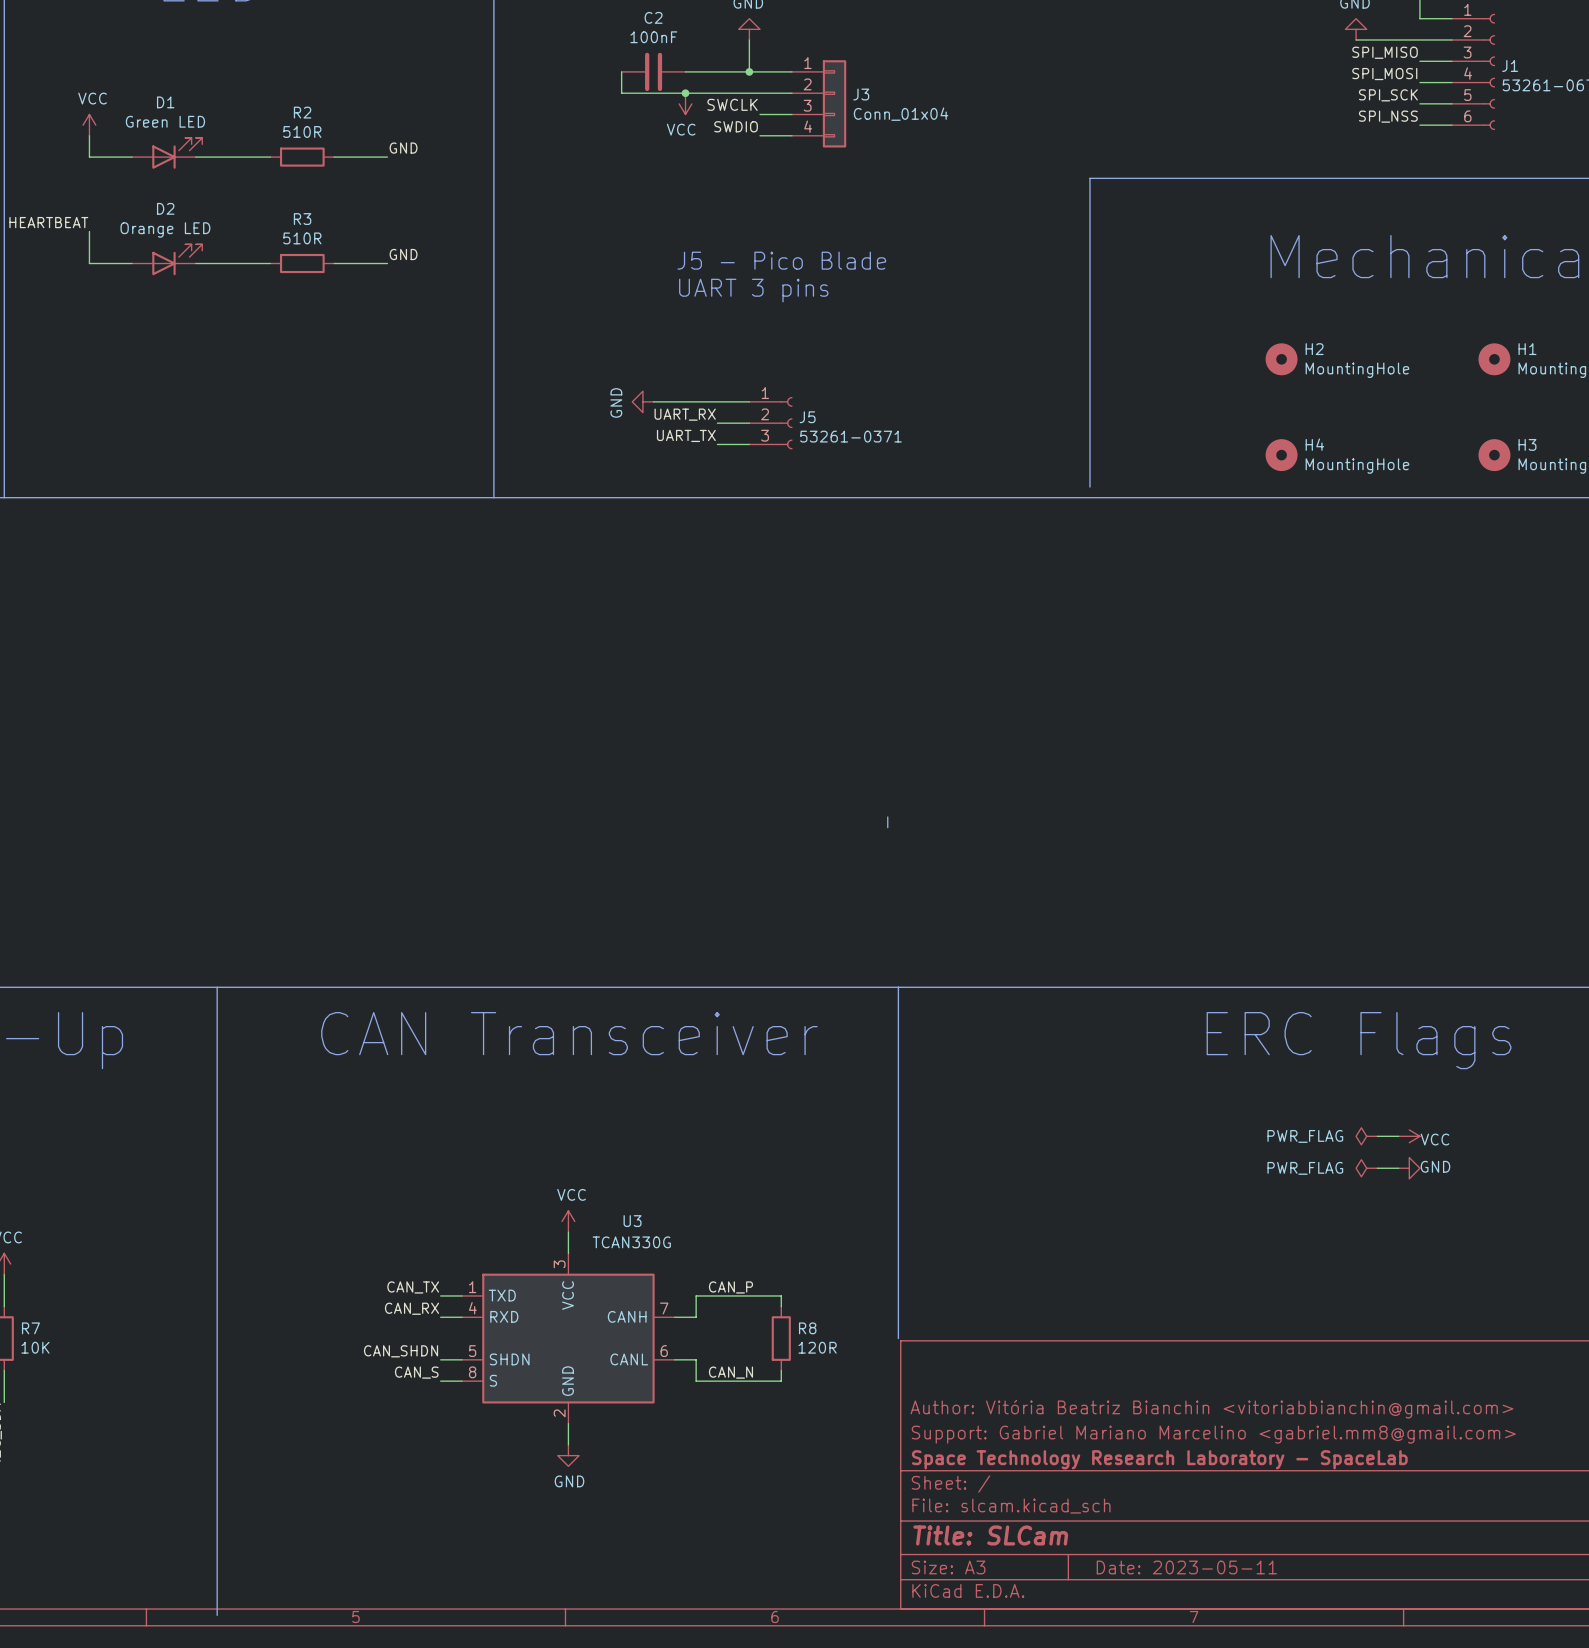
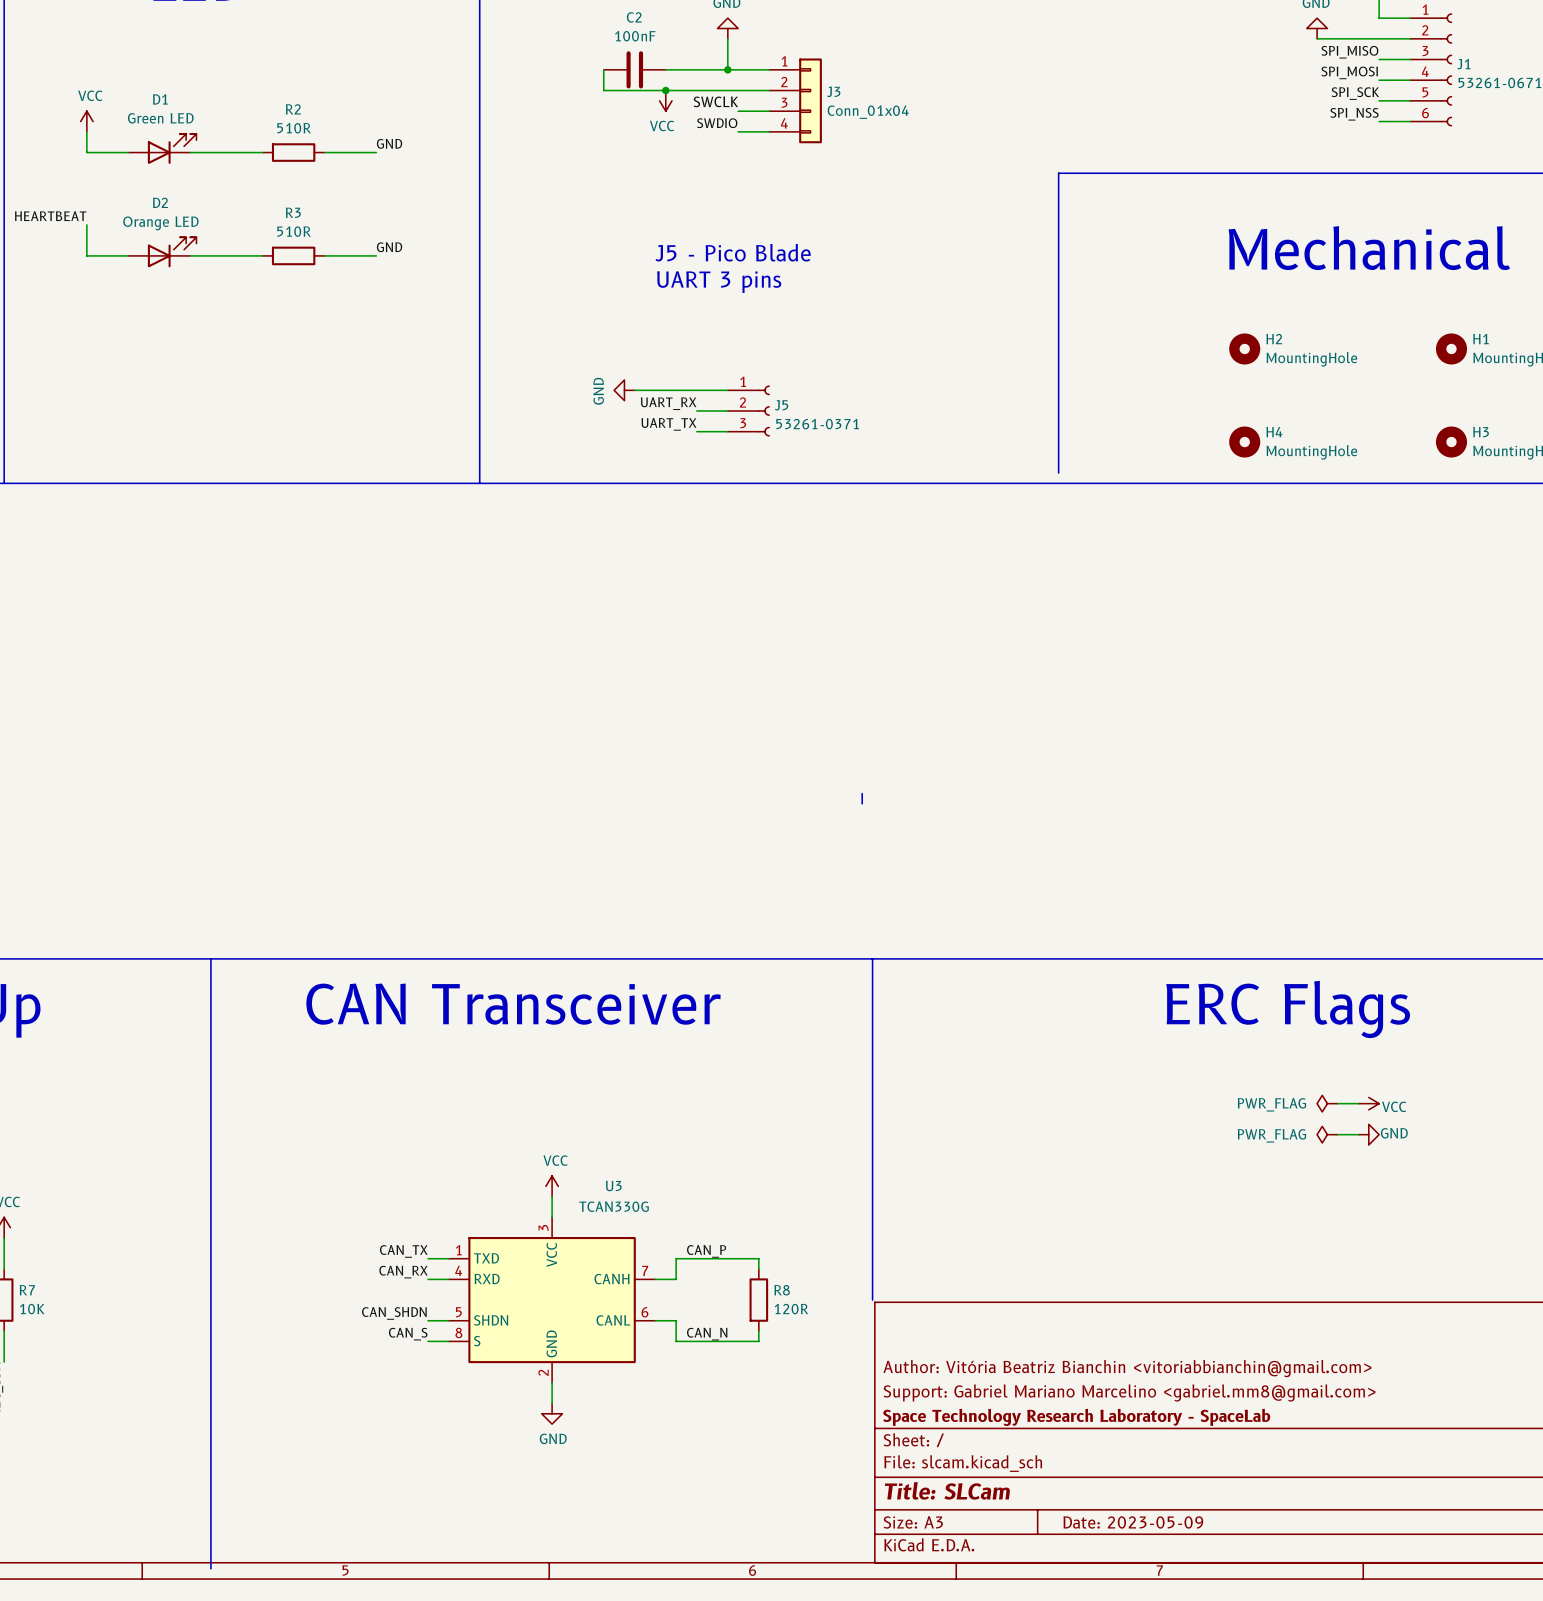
title block: Date: 2023-05-11 (1186, 1567) -> Date: 2023-05-09 (1133, 1522)

